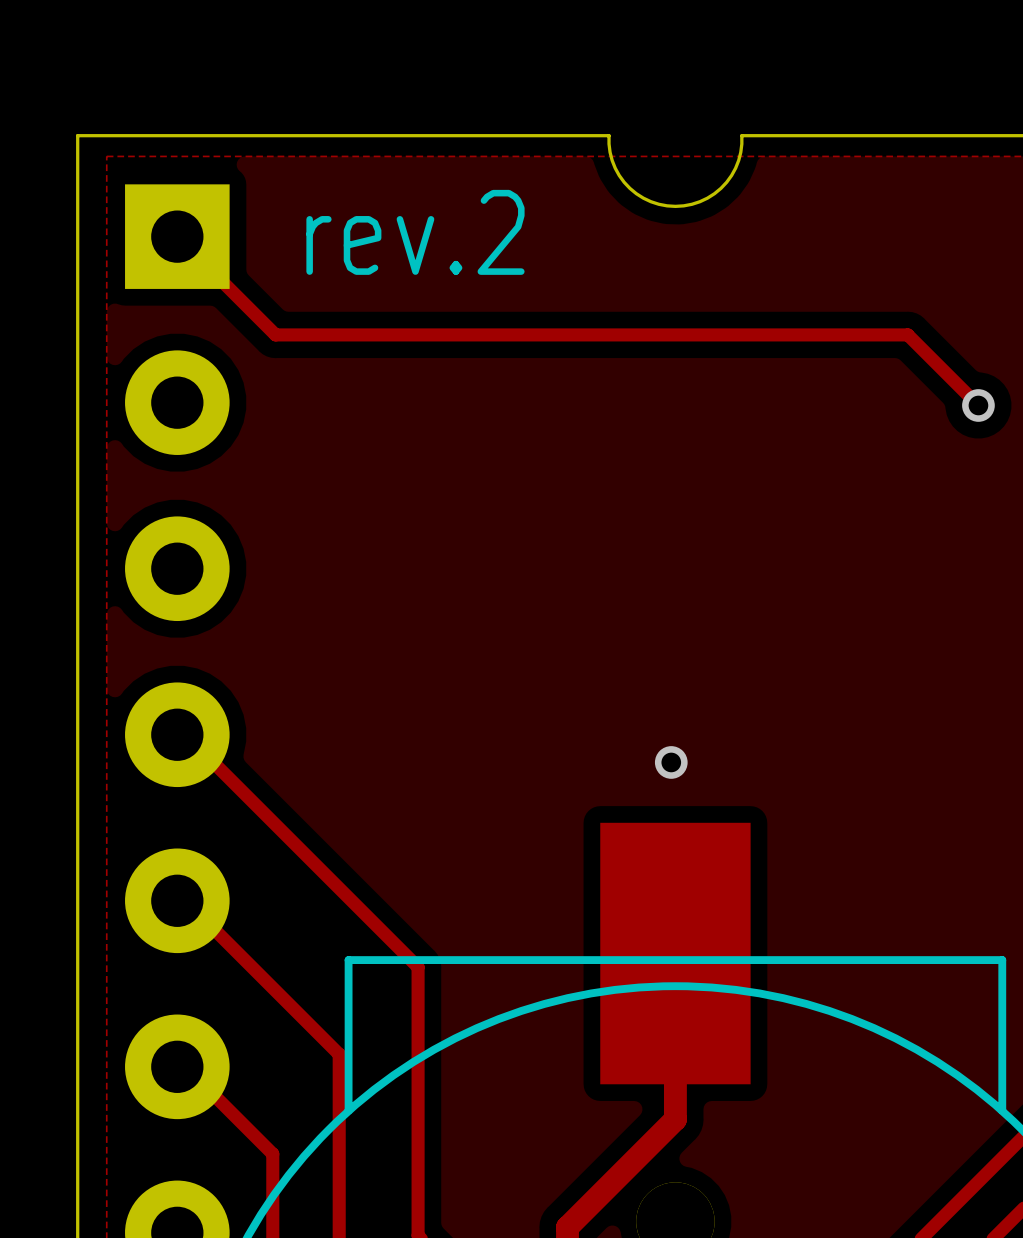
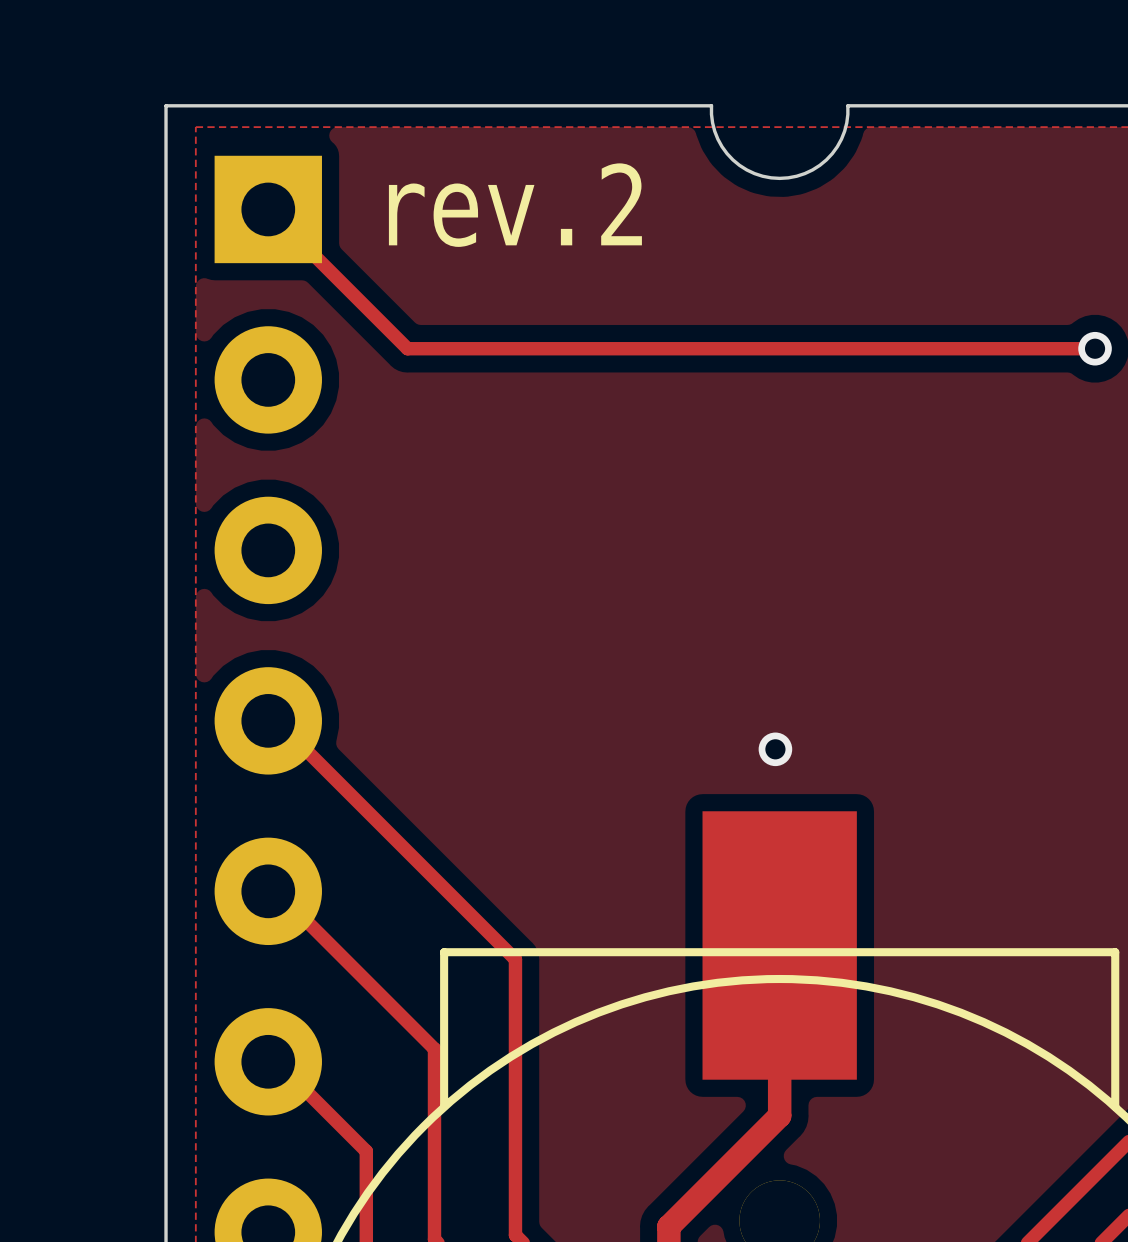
track: (275, 334) (907, 334) (978, 405) -> (369, 310) (407, 348) (1095, 348)
via position: (978, 405) -> (1095, 348)

